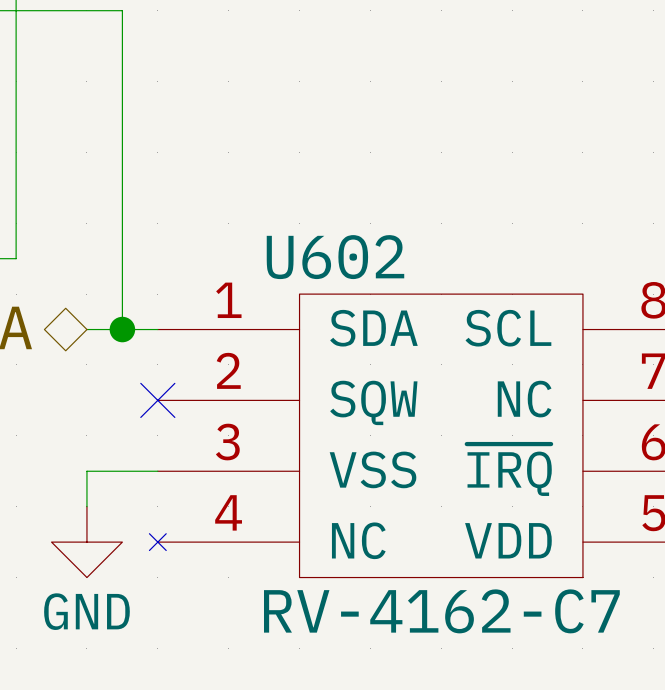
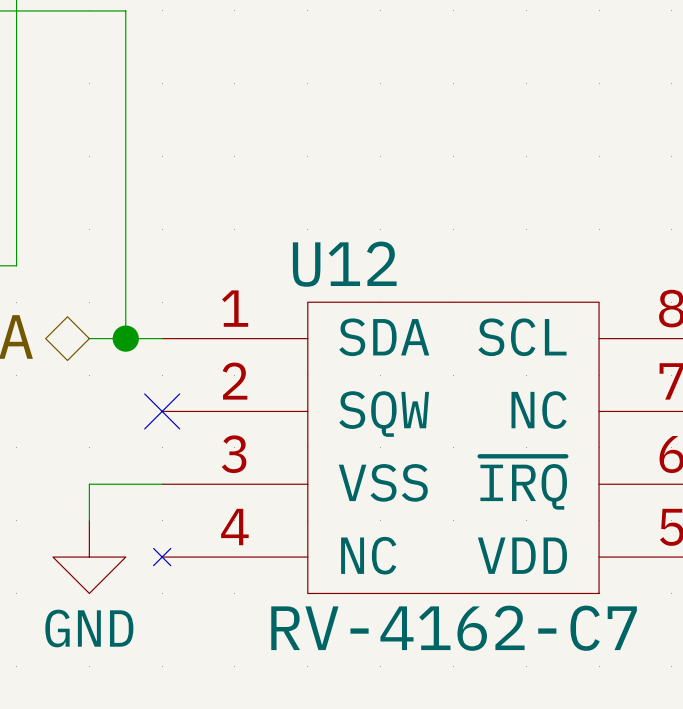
U602 name: U602 (335, 257) -> U12 (344, 264)

